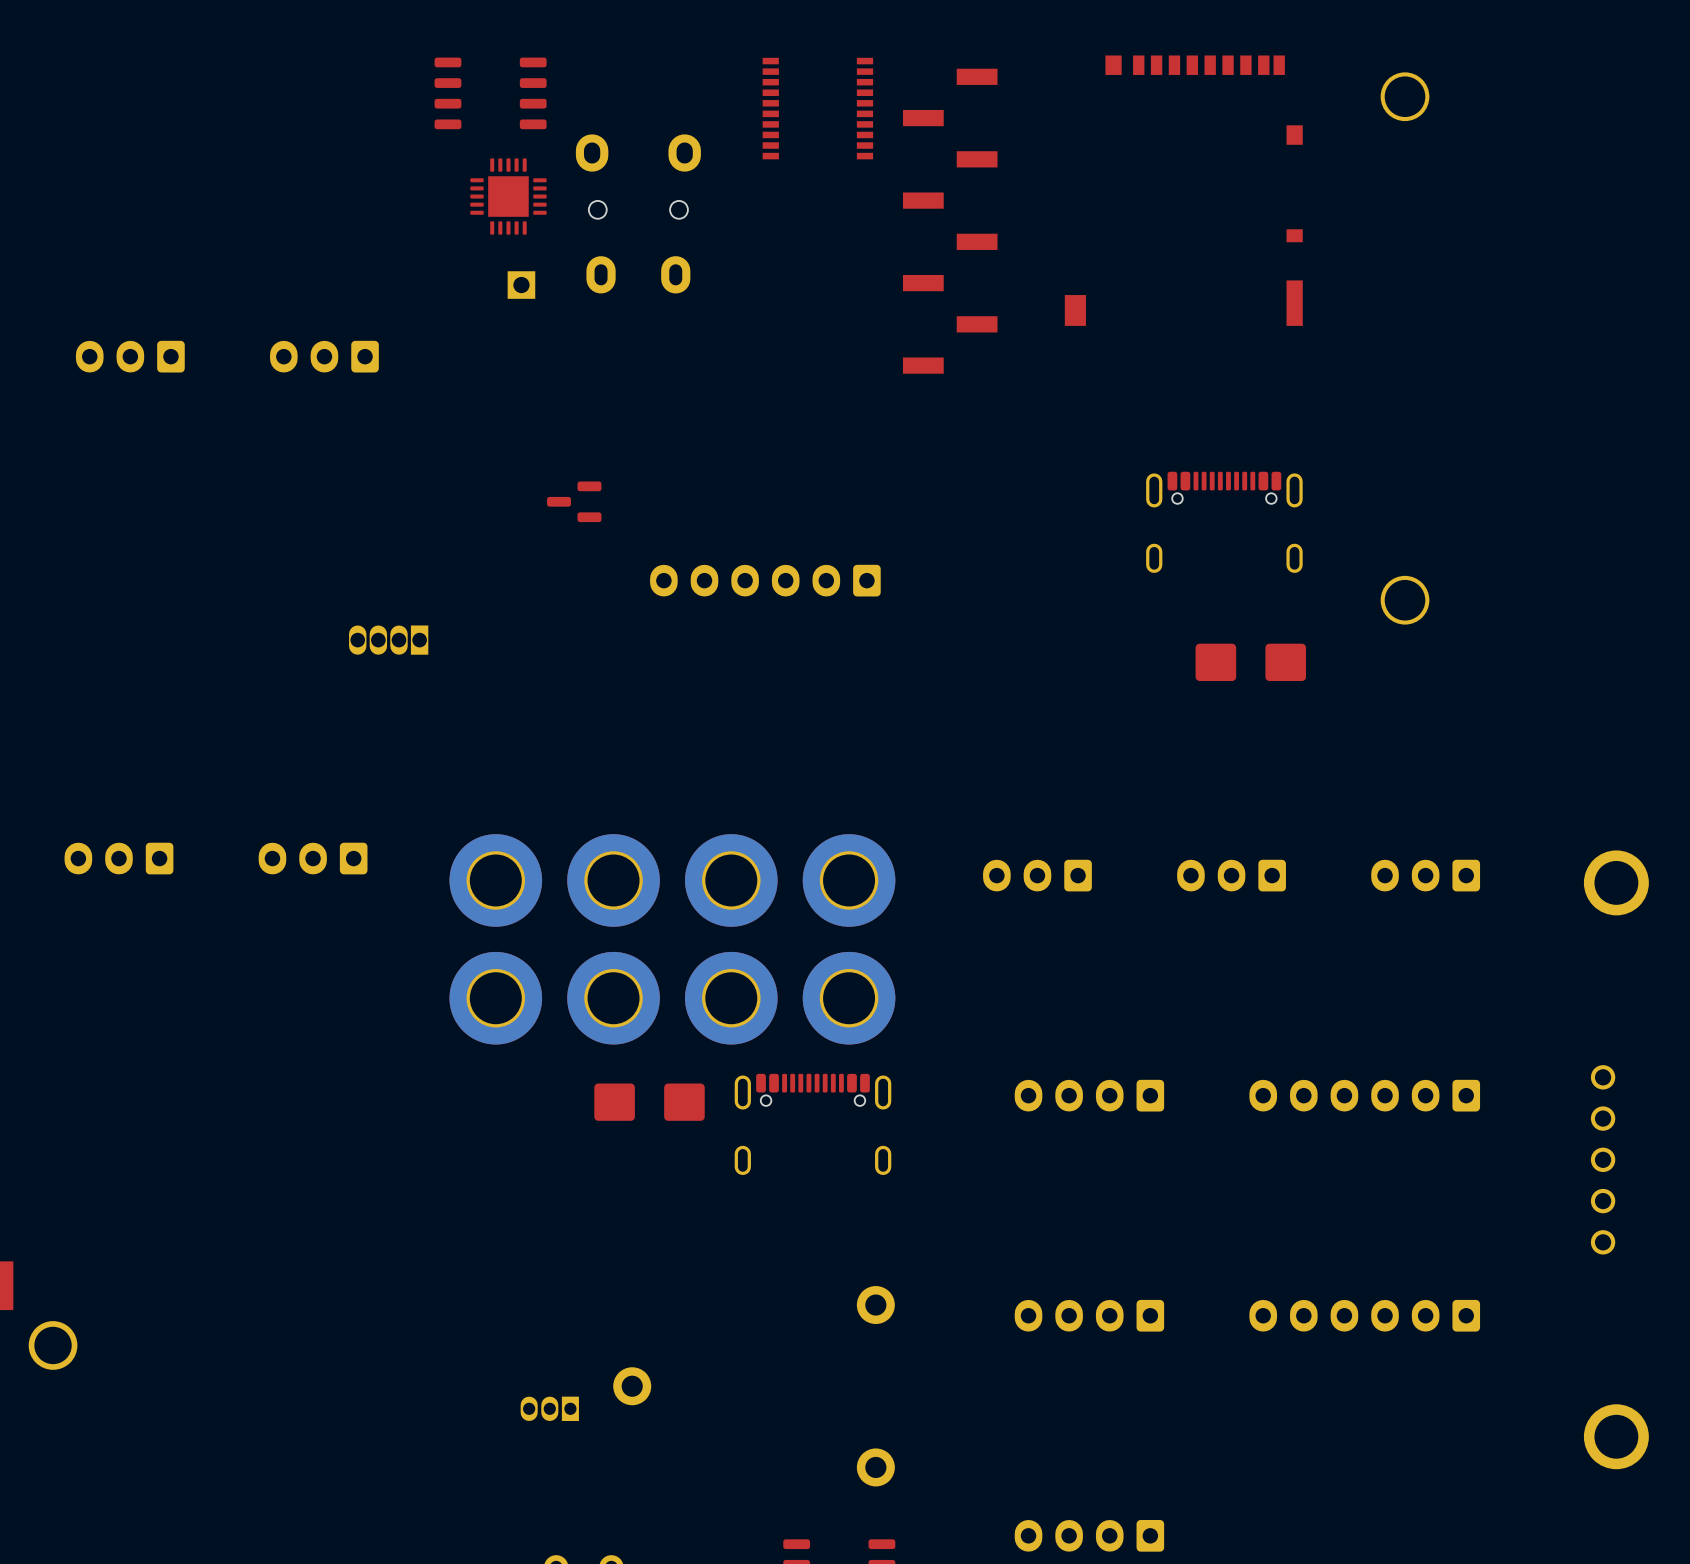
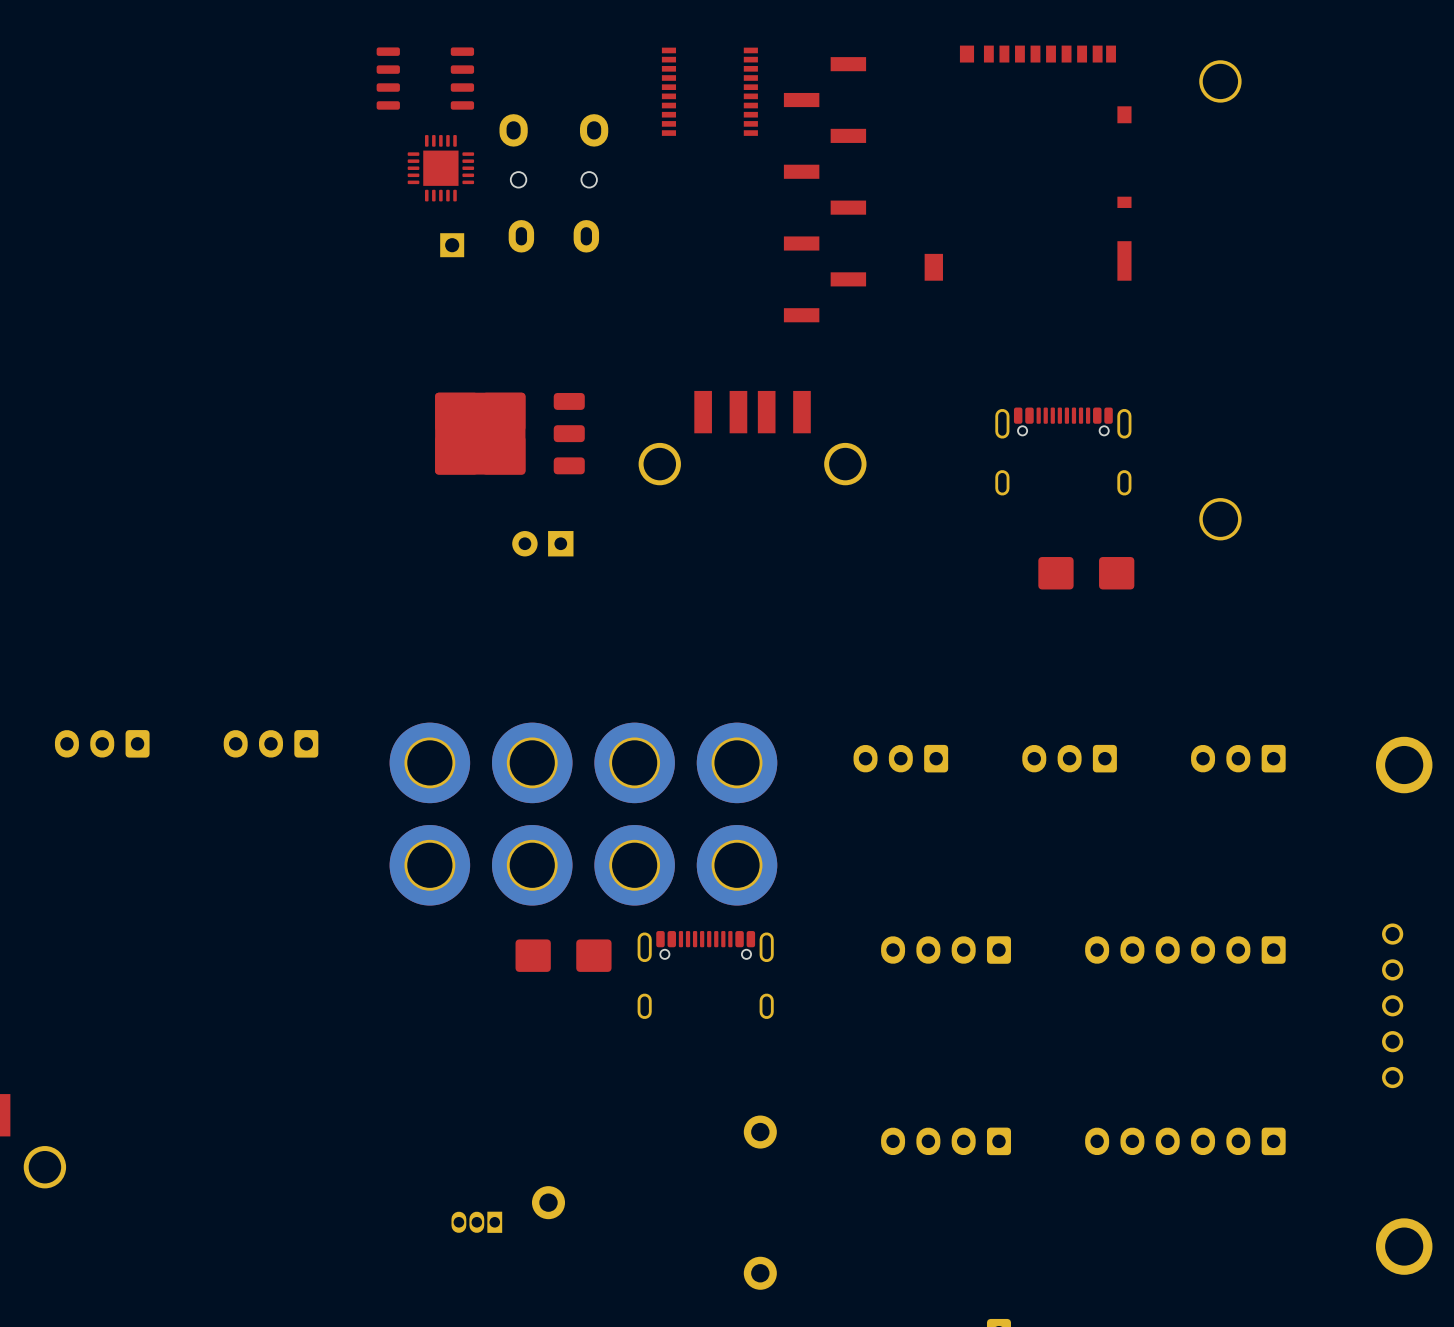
part: (130, 356) -> none
part: (324, 356) -> none
part footprint: [547, 481, 602, 523] -> [435, 392, 585, 475]
part: none -> (752, 438)
part: (765, 580) -> none
part: none -> (542, 543)
part: (388, 640) -> none

